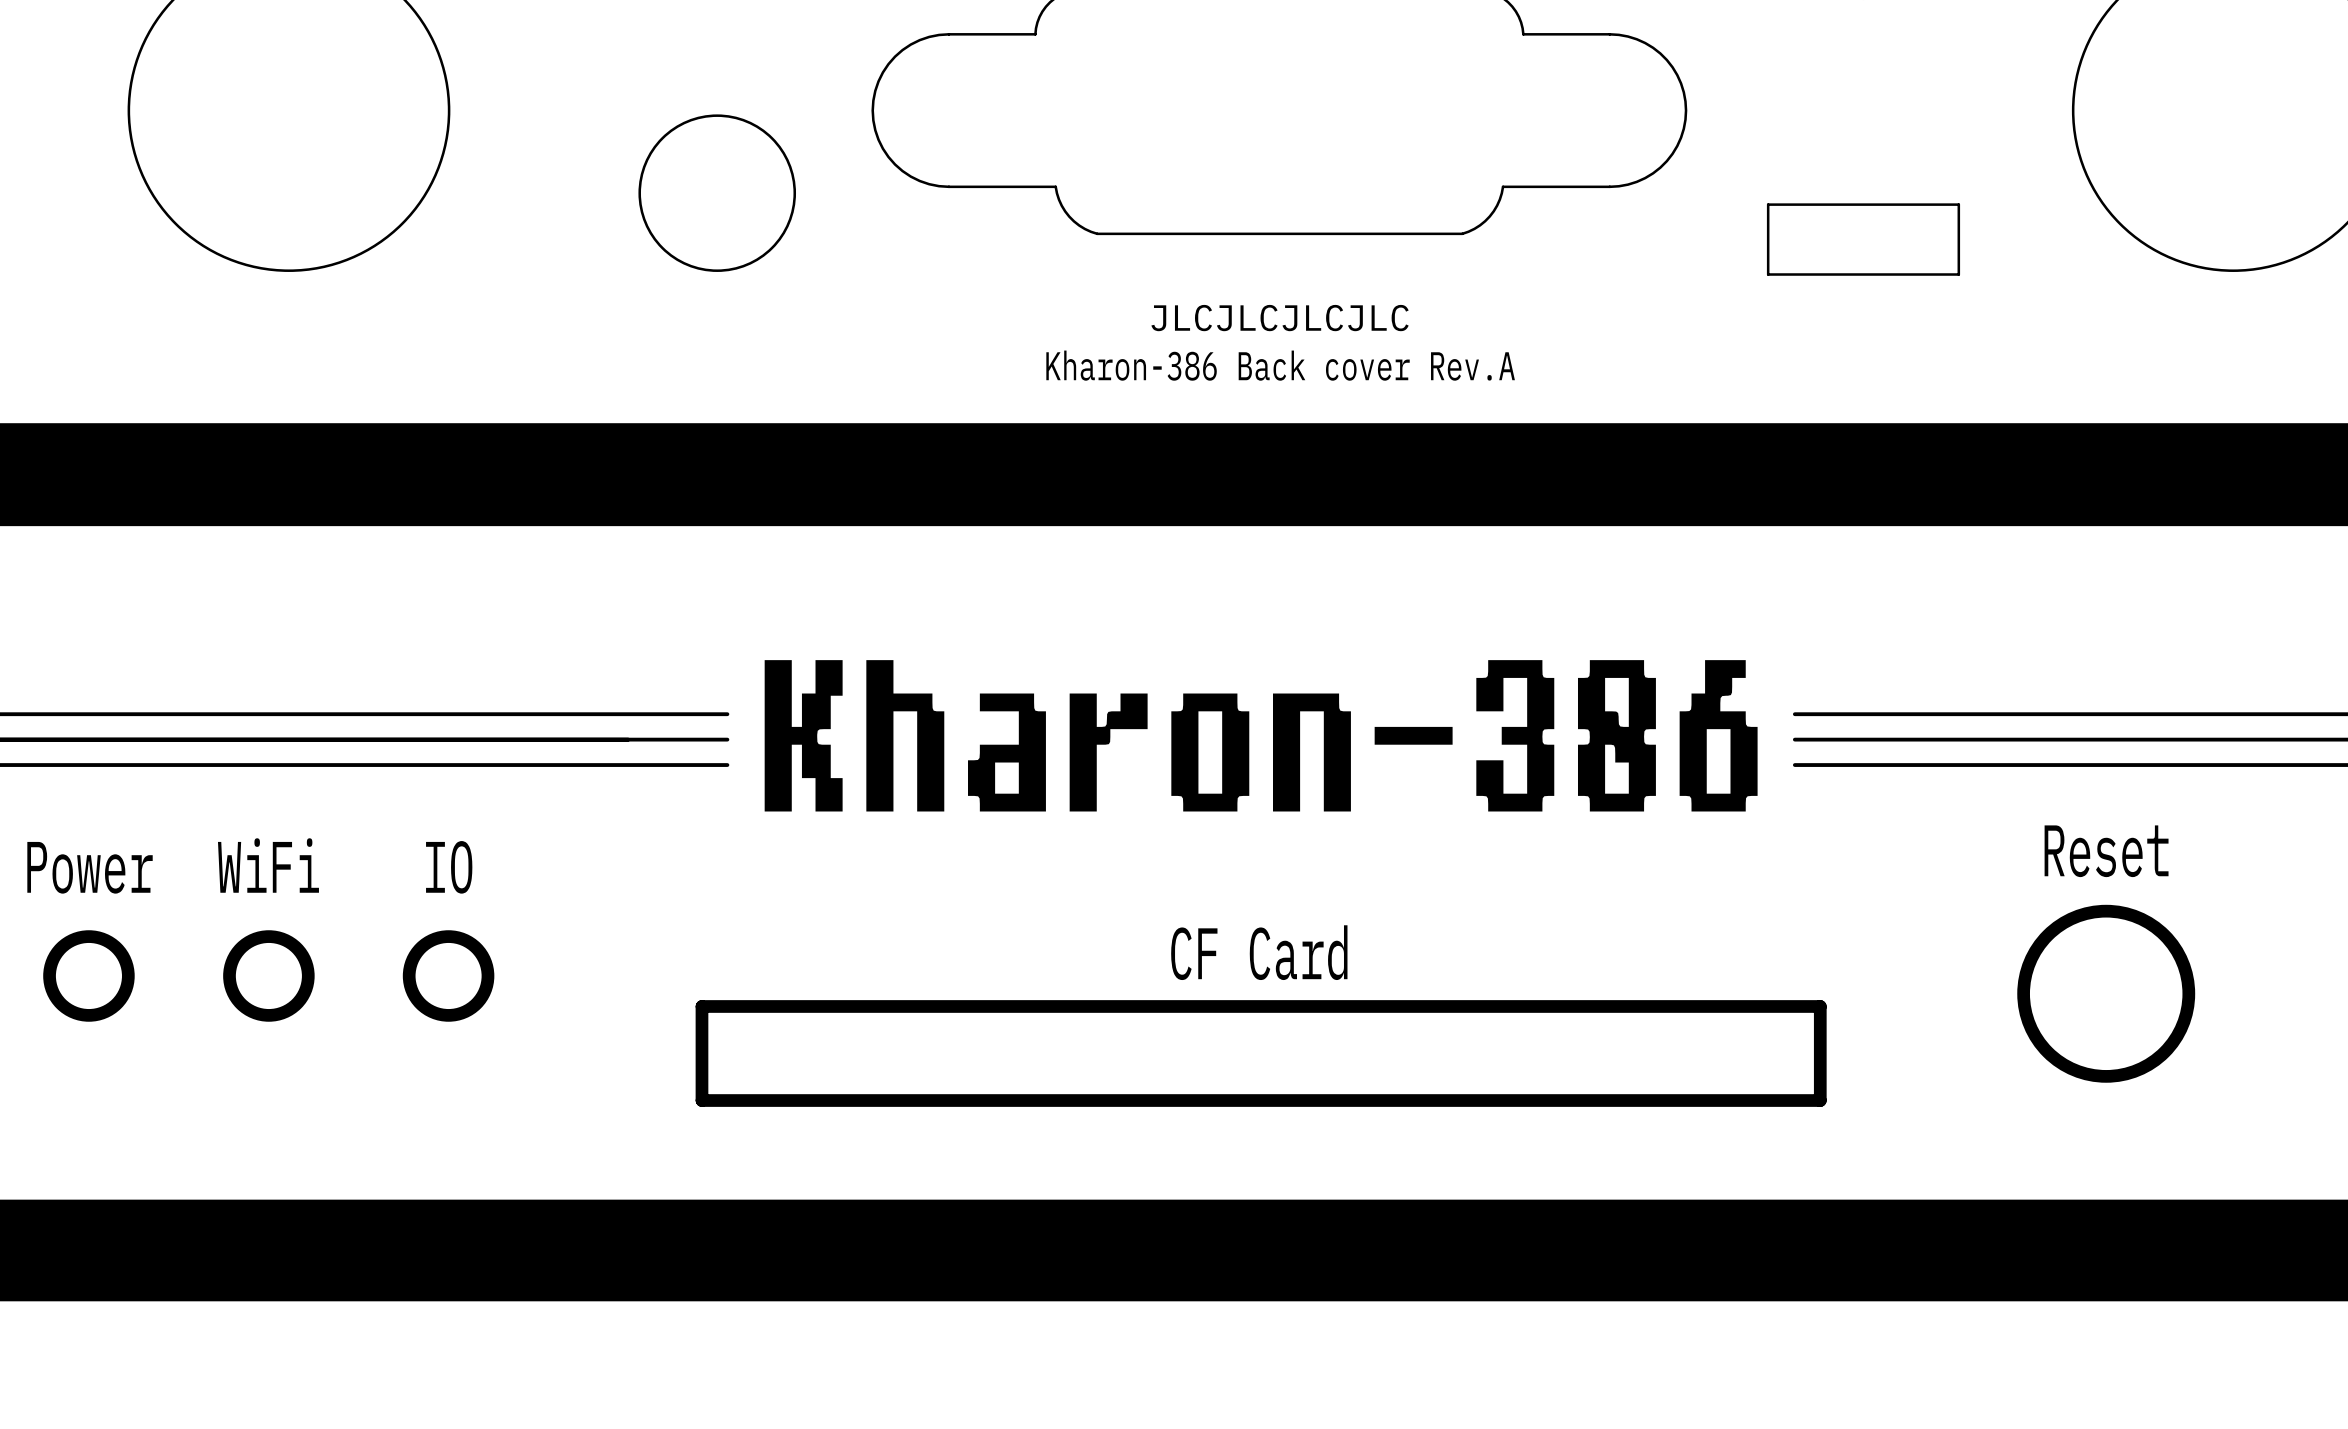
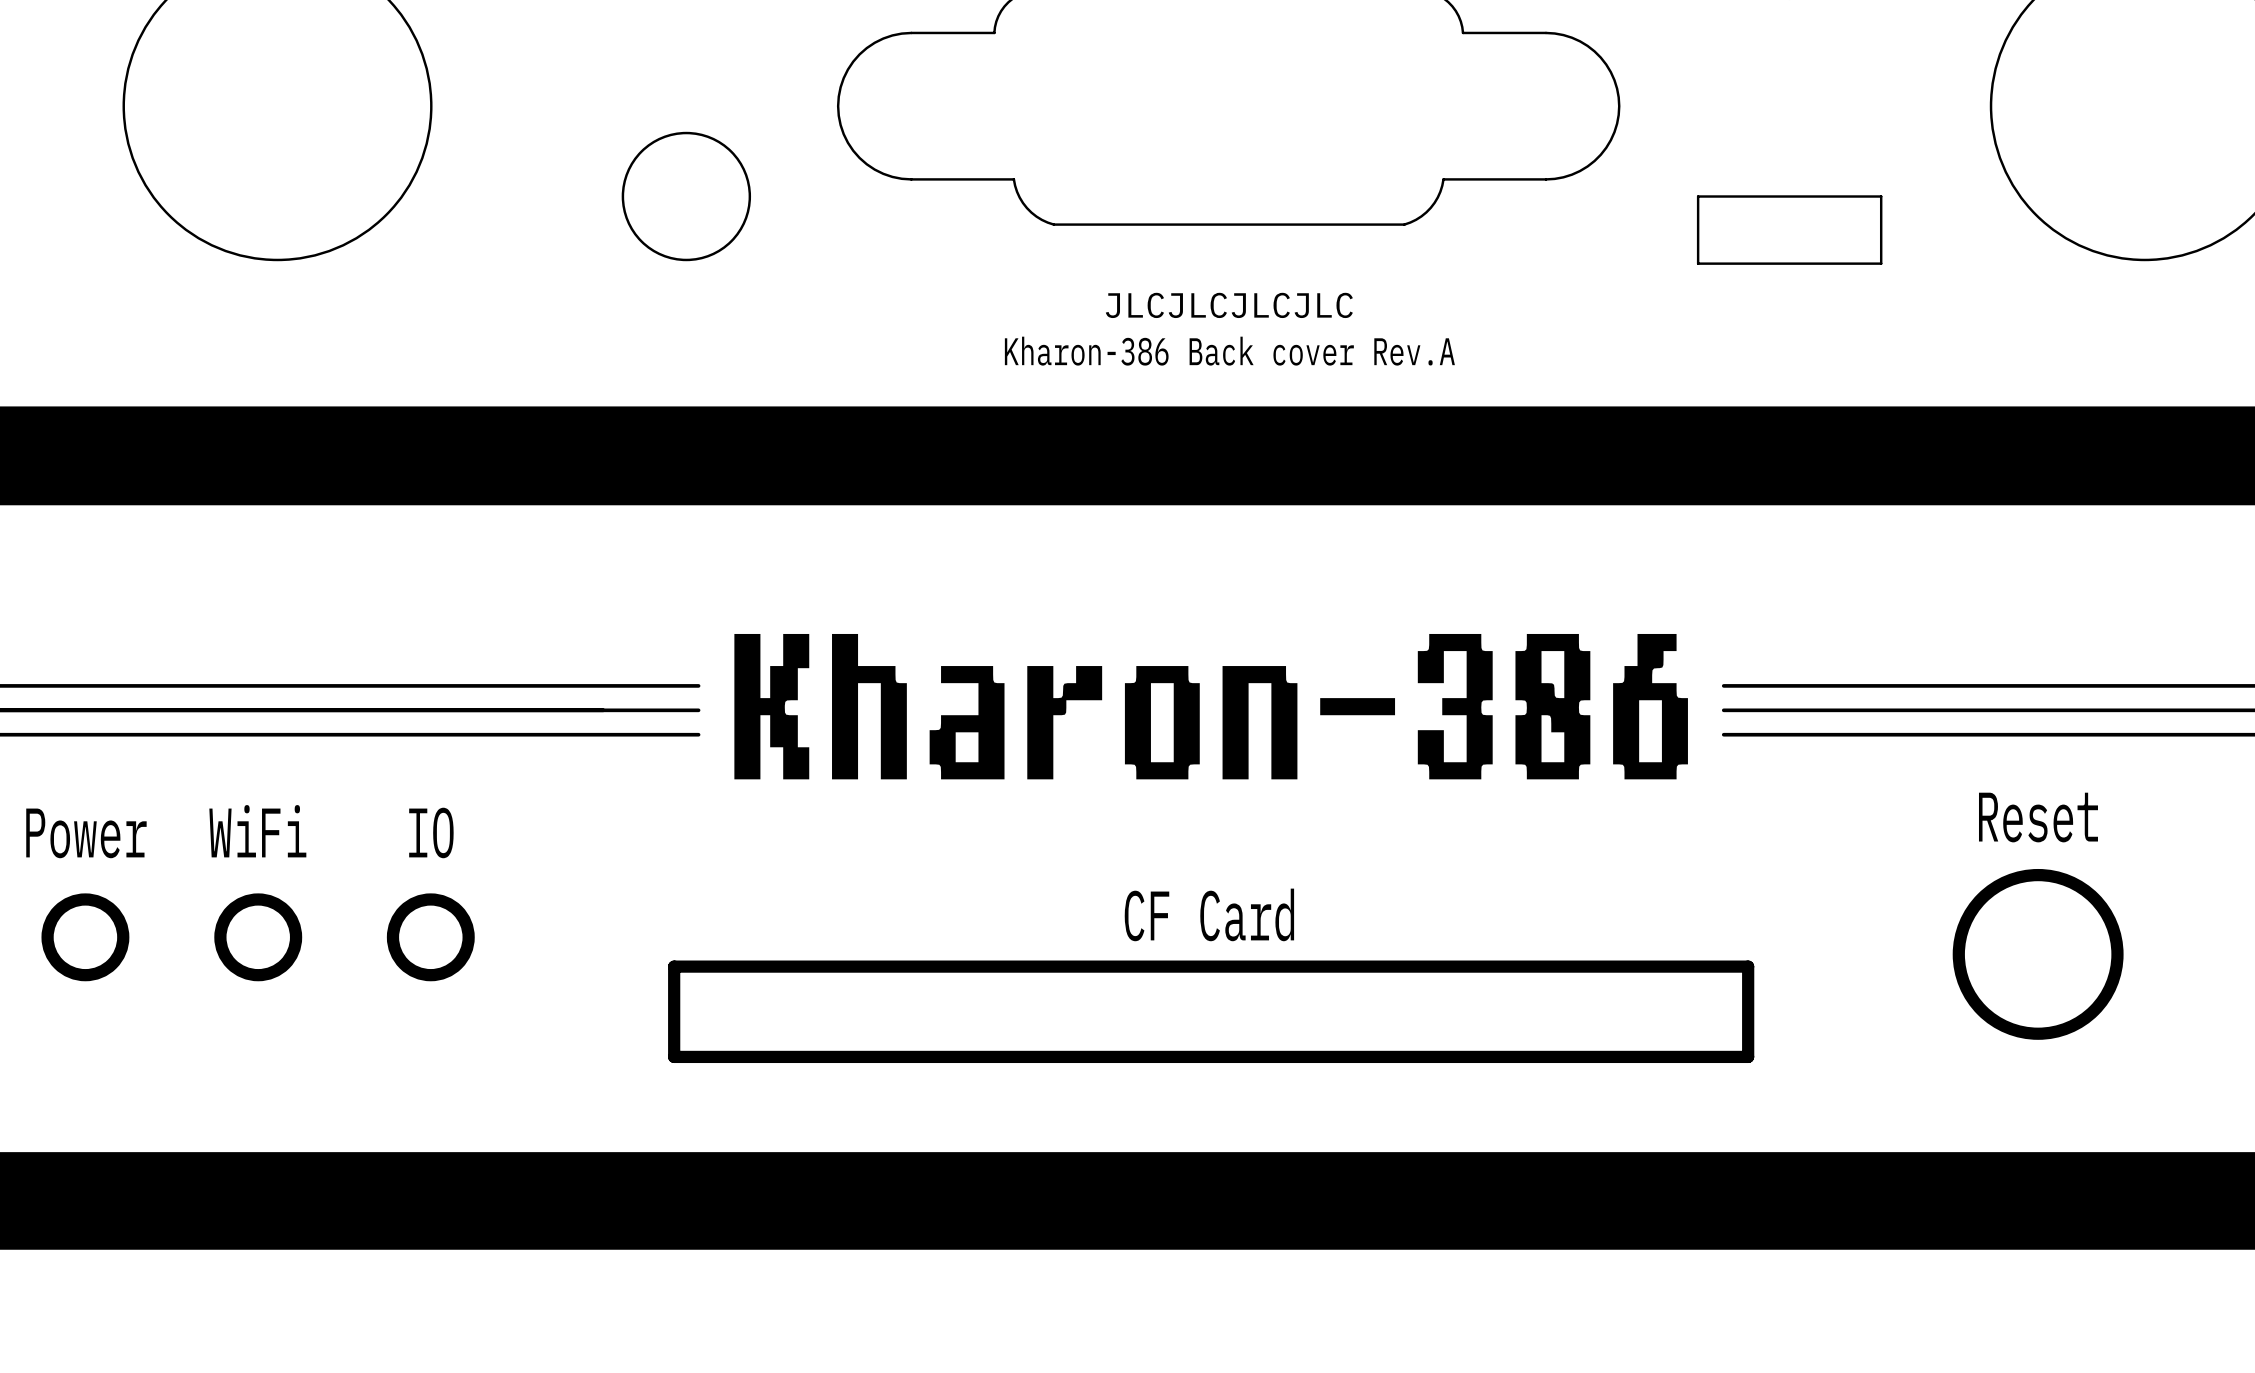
round board edge size: [638, 114, 797, 272] -> [621, 131, 752, 262]
text position: Reset (2106, 851) -> Reset (2038, 817)
drawing position: (2106, 993) -> (2038, 954)

